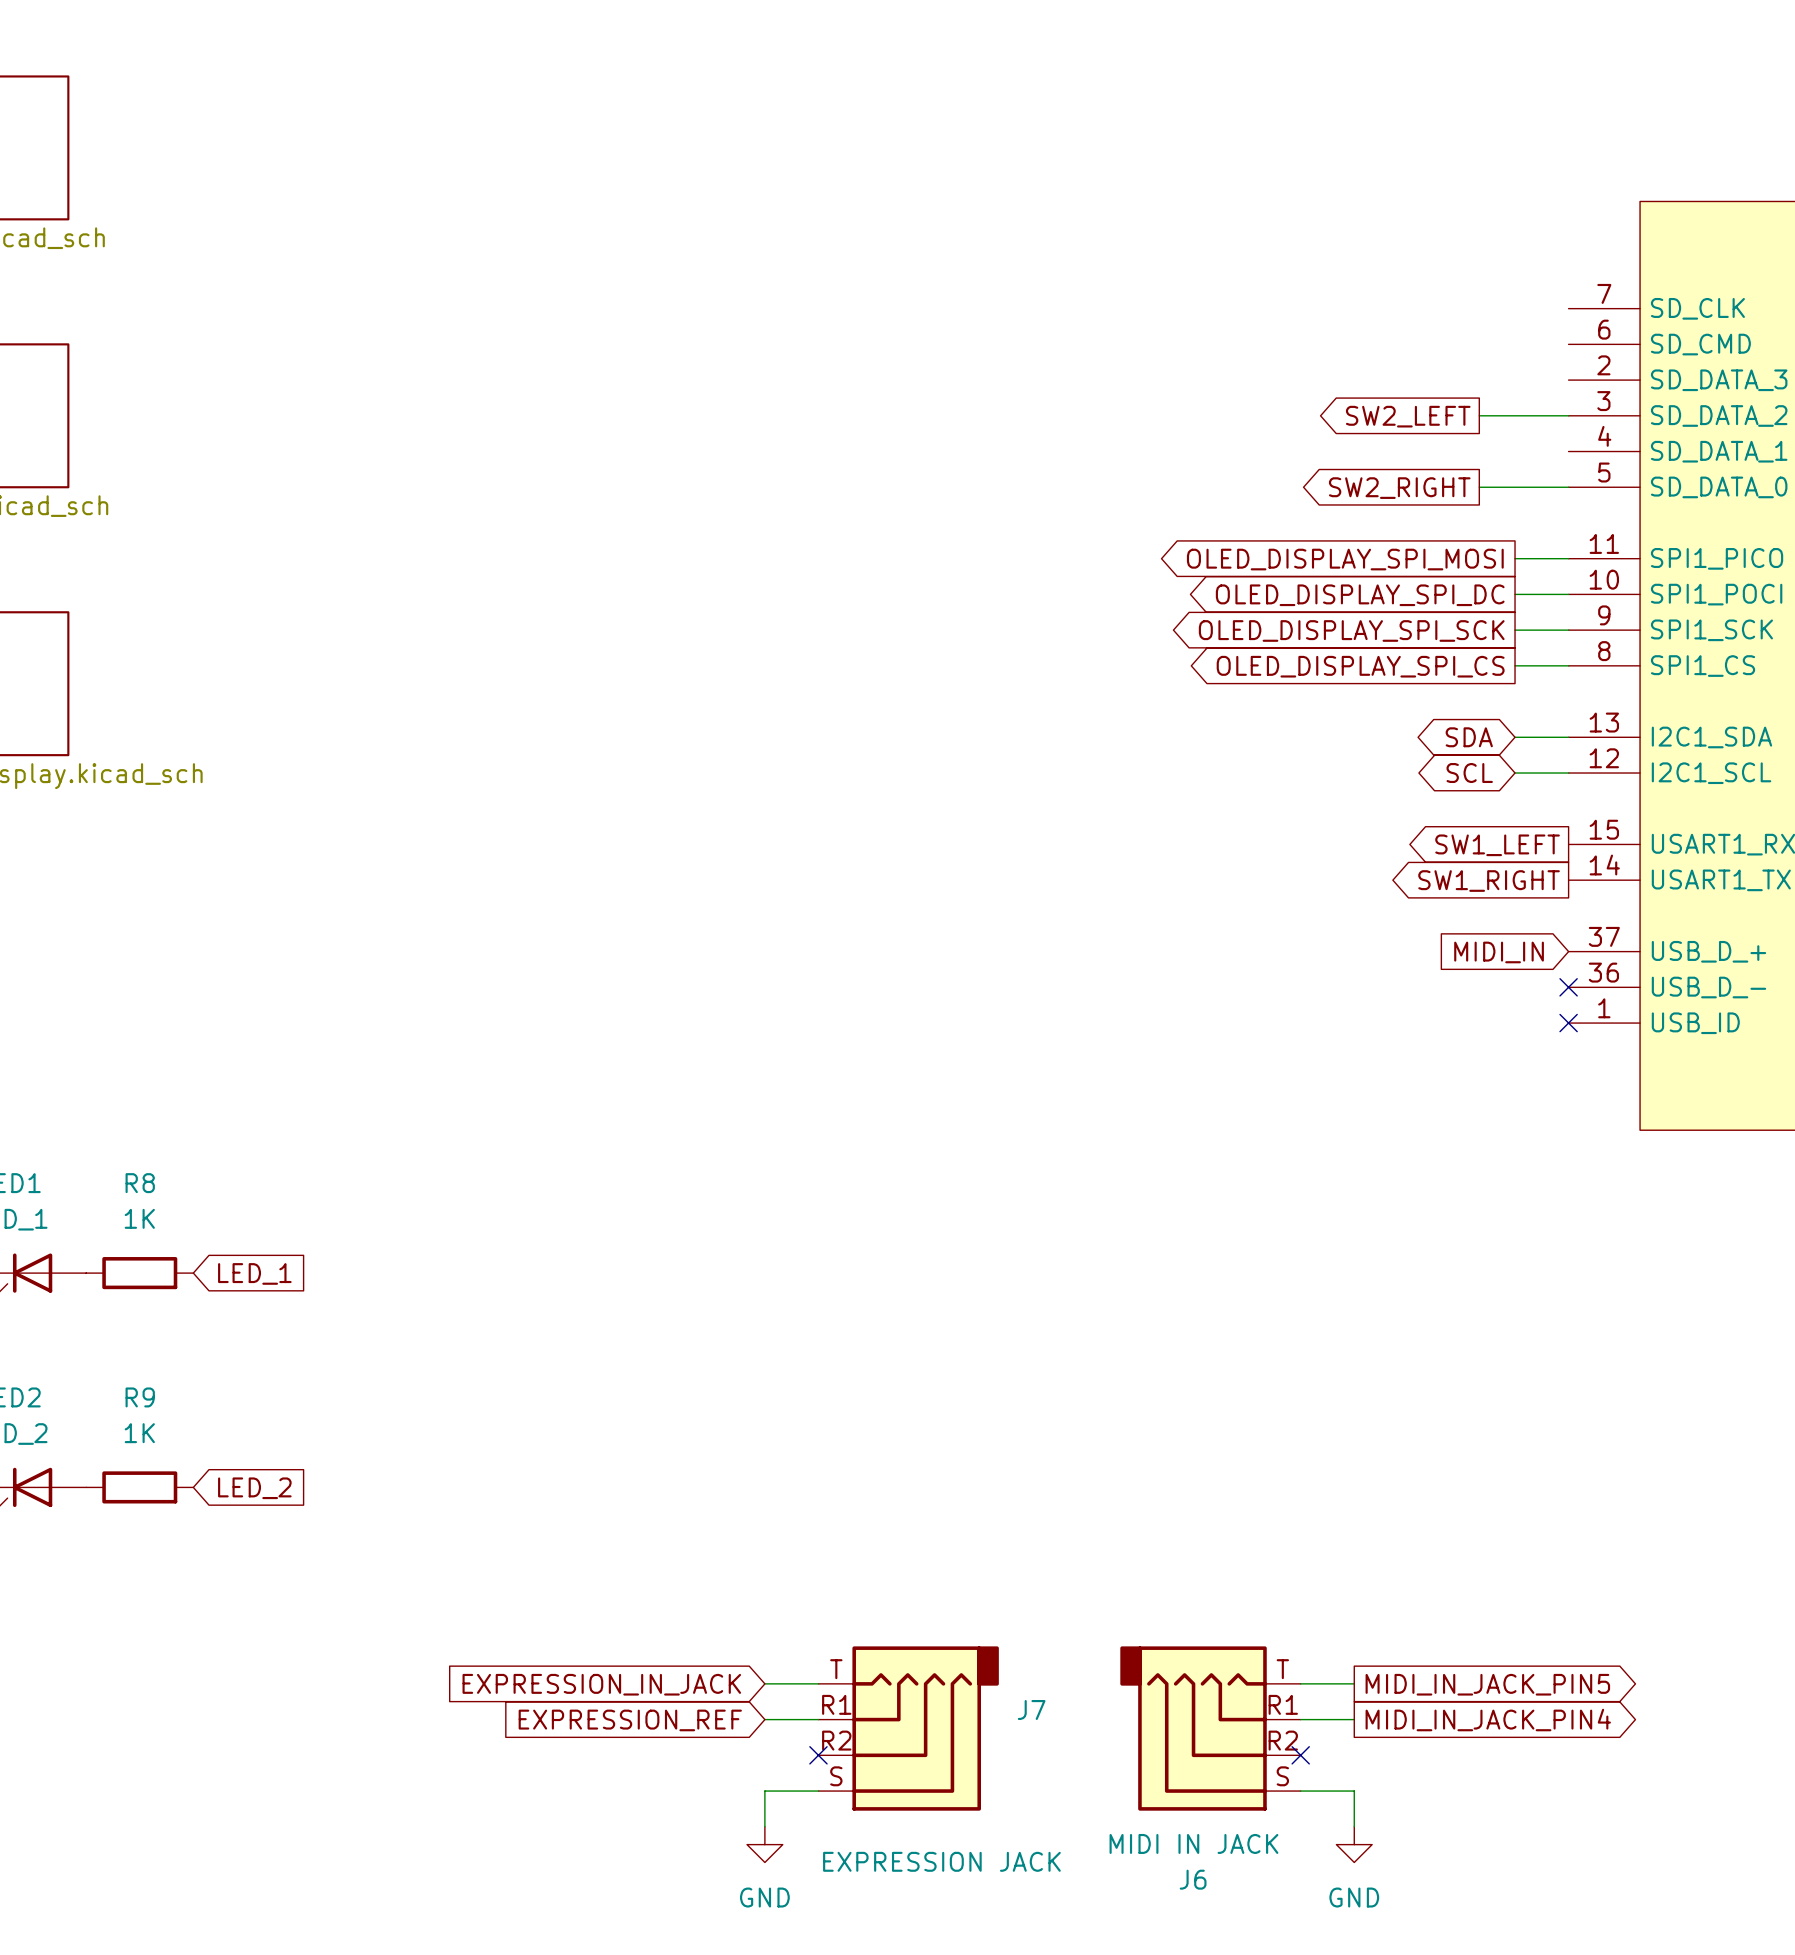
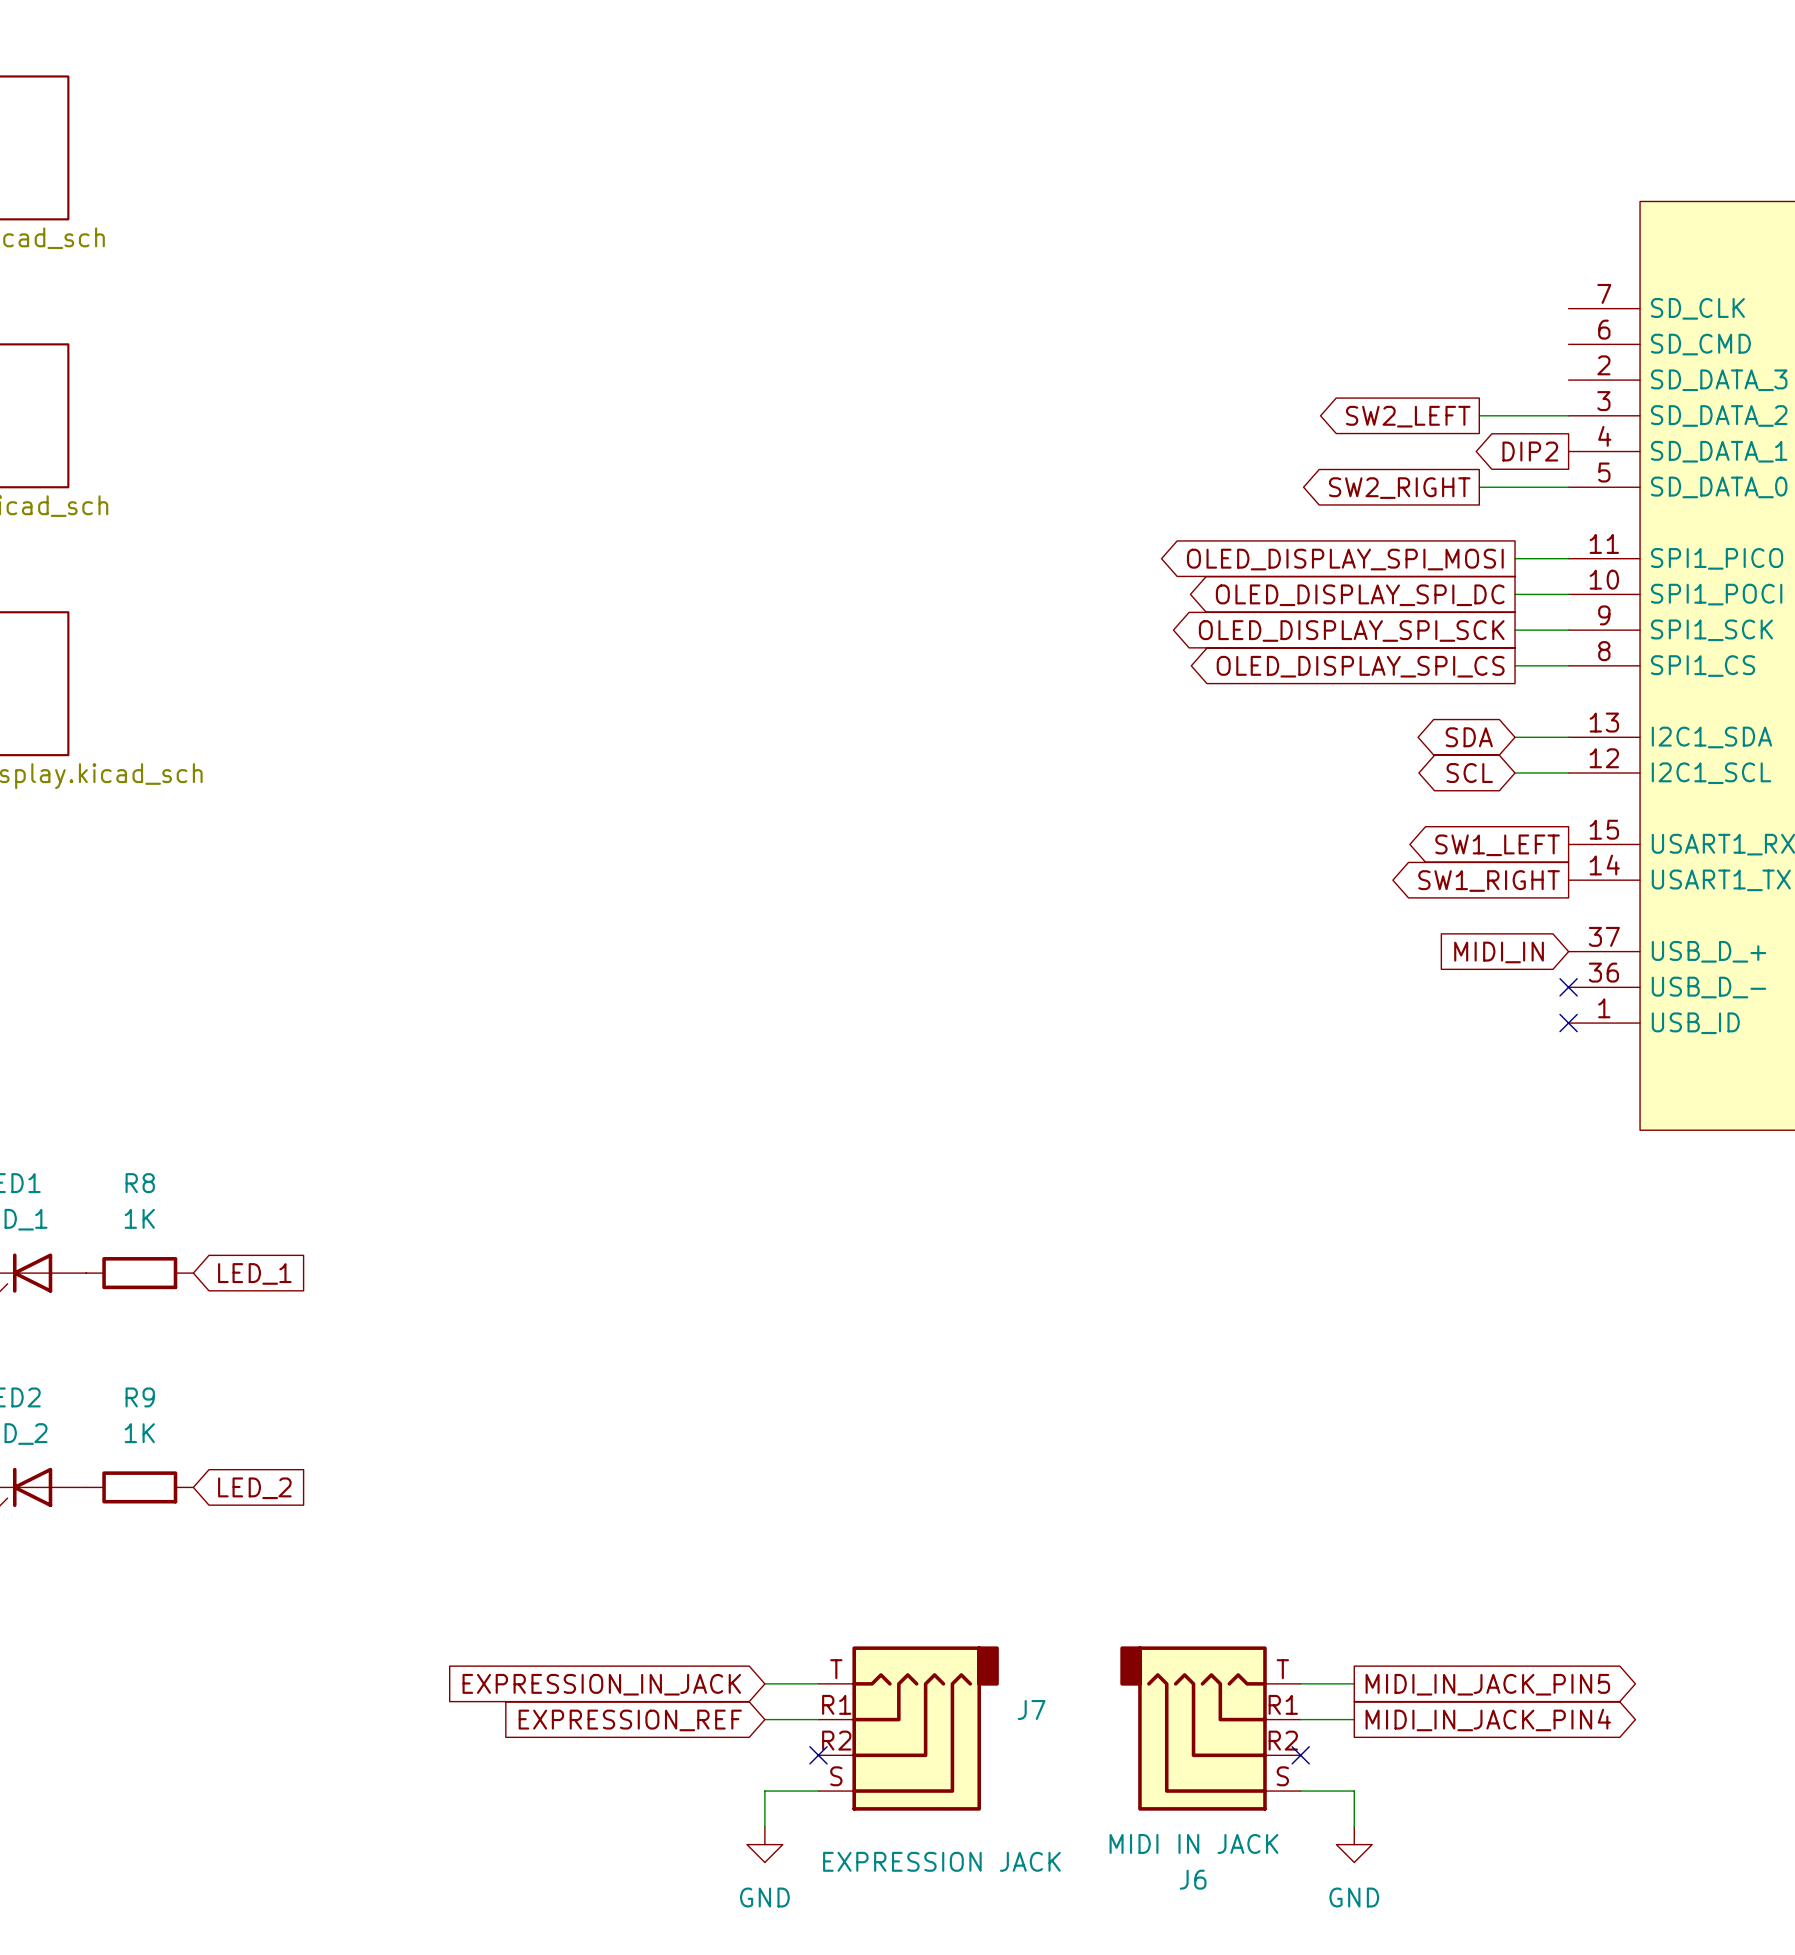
global label: none -> DIP2 (1530, 451)

